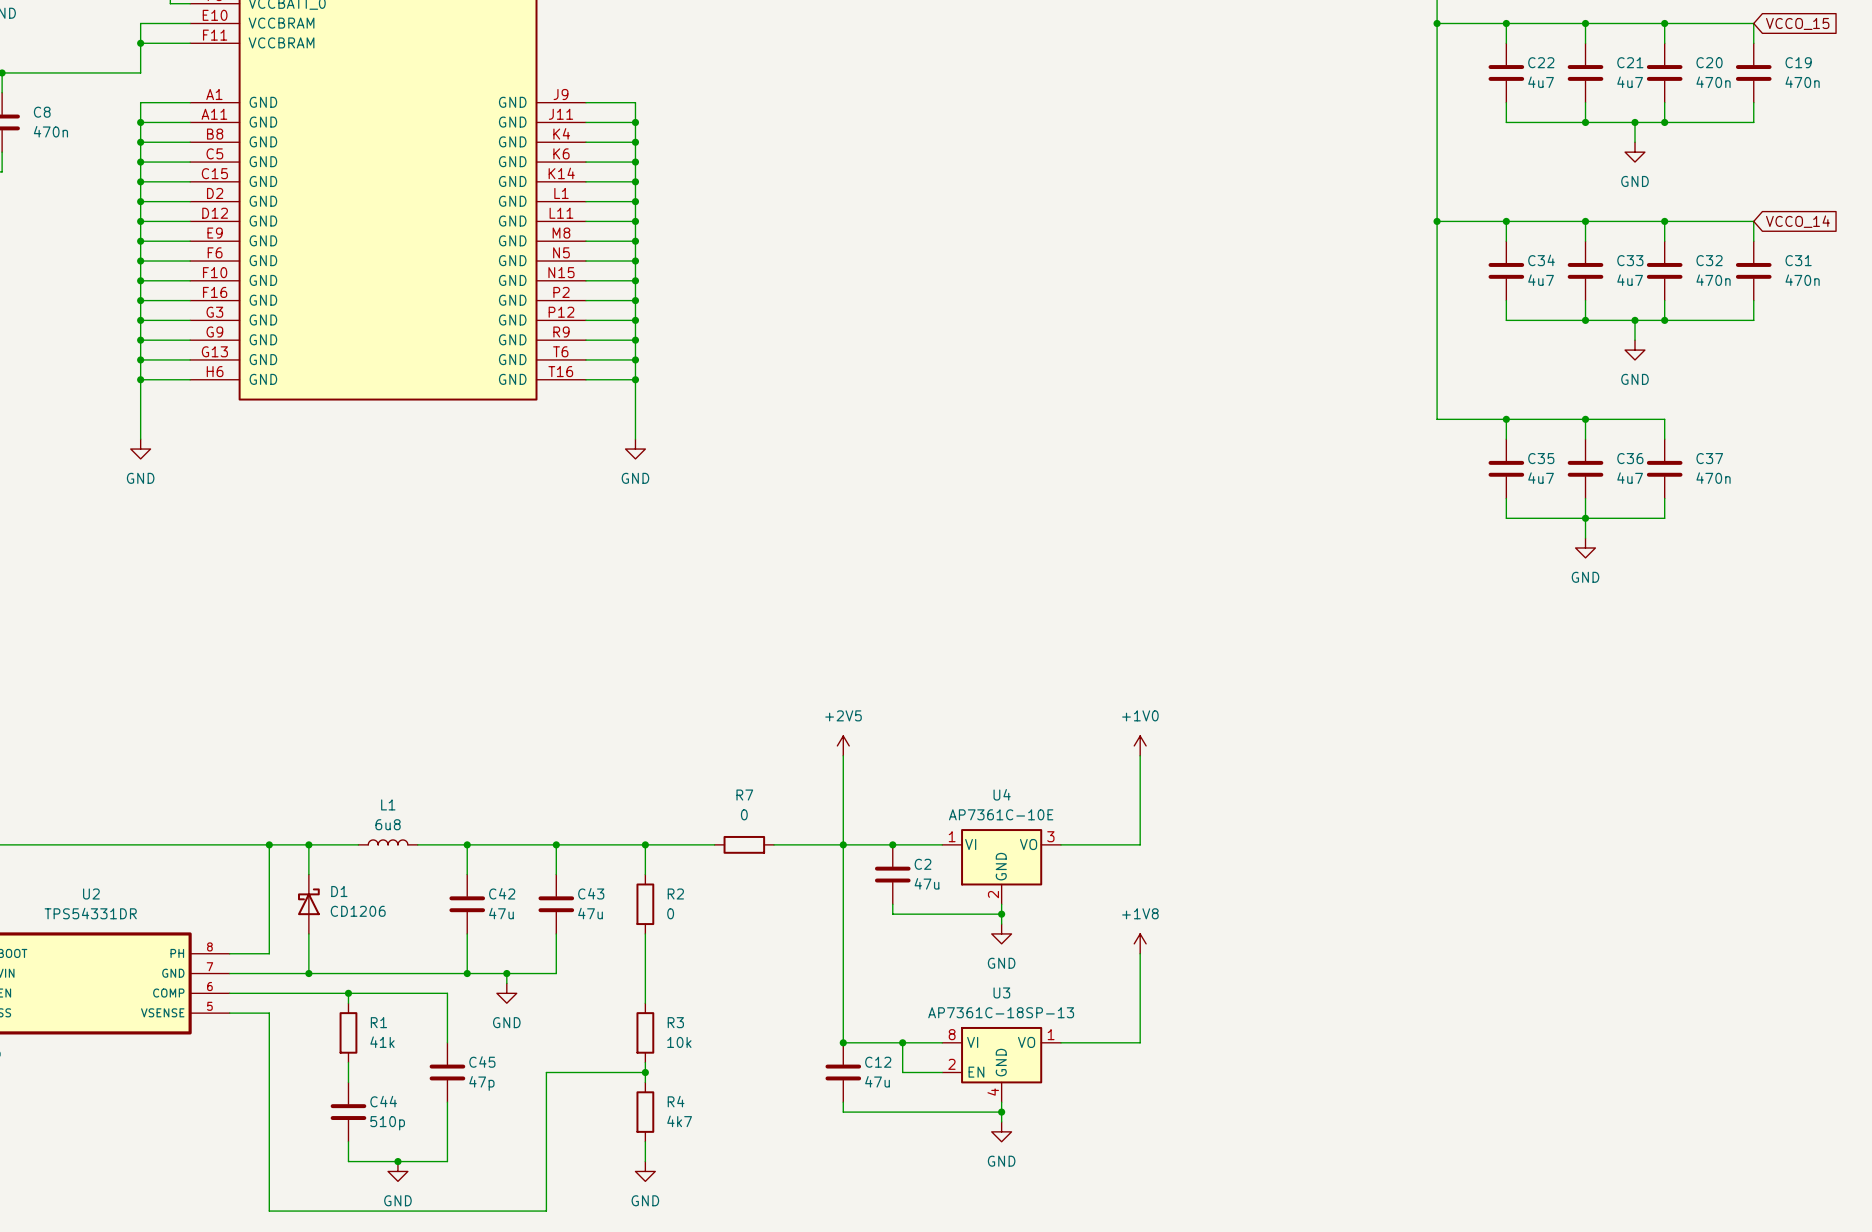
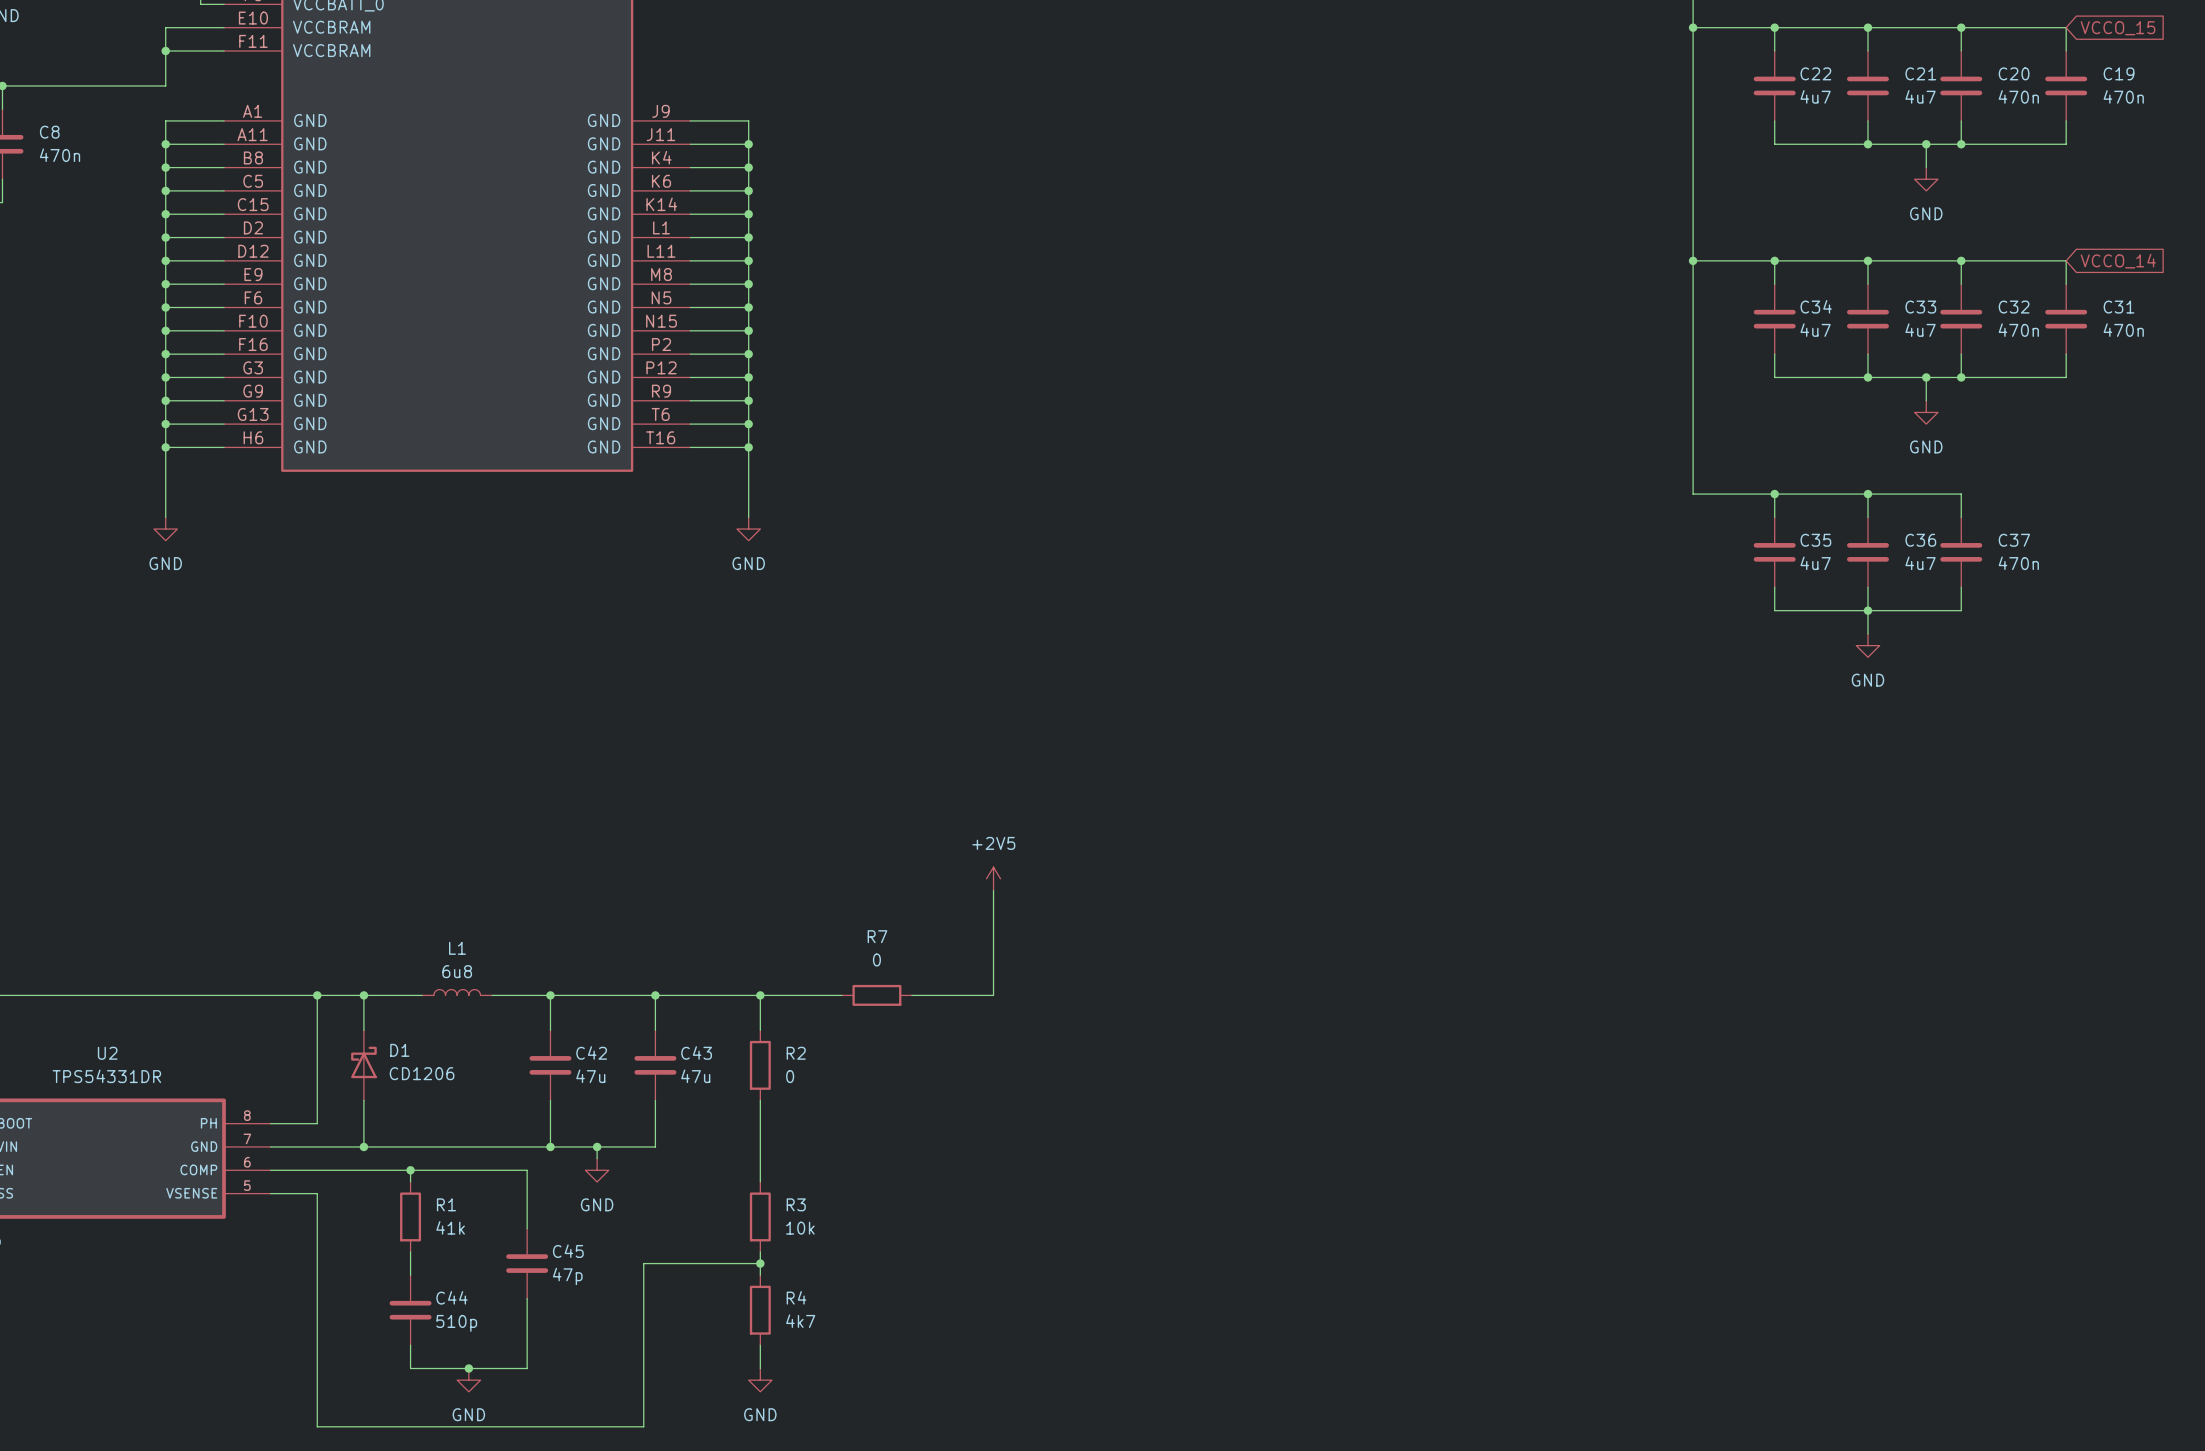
power symbol: +1V0 (1140, 745) -> none
wire: (1140, 755) (1140, 844) (1061, 844) -> none
junction: (843, 844) -> none
junction: (892, 844) -> none
wire: (942, 844) (843, 844) (843, 1042) (942, 1042) -> none
U4: AP7361C-10E (1001, 866) -> none
C2: 47u (892, 874) -> none
wire: (892, 904) (892, 914) (1001, 914) -> none
wire: (1001, 904) (1001, 924) -> none
junction: (1001, 914) -> none
power symbol: GND (1001, 933) -> none
power symbol: +1V8 (1140, 943) -> none
wire: (1140, 953) (1140, 1042) (1061, 1042) -> none
junction: (843, 1042) -> none
wire: (902, 1042) (902, 1072) (942, 1072) -> none
junction: (902, 1042) -> none
U3: AP7361C-18SP-13 (1001, 1064) -> none
C12: 47u (843, 1072) -> none
wire: (843, 1102) (843, 1112) (1001, 1112) -> none
wire: (1001, 1102) (1001, 1121) -> none
junction: (1001, 1112) -> none
power symbol: GND (1001, 1131) -> none

